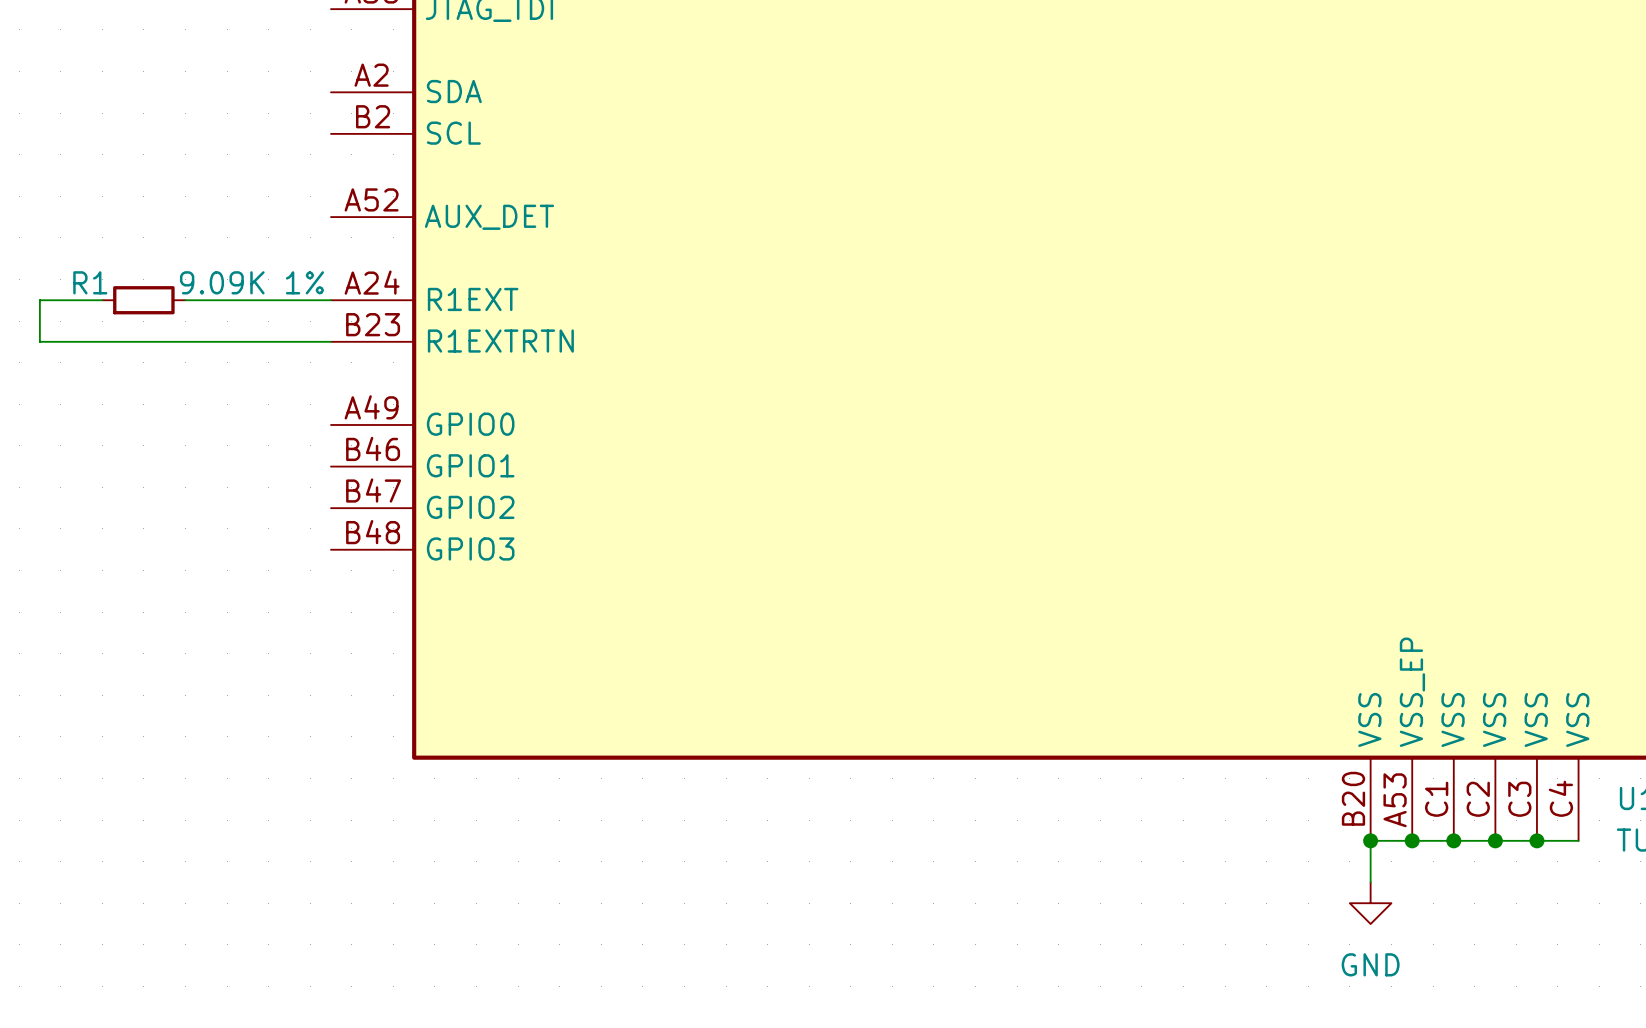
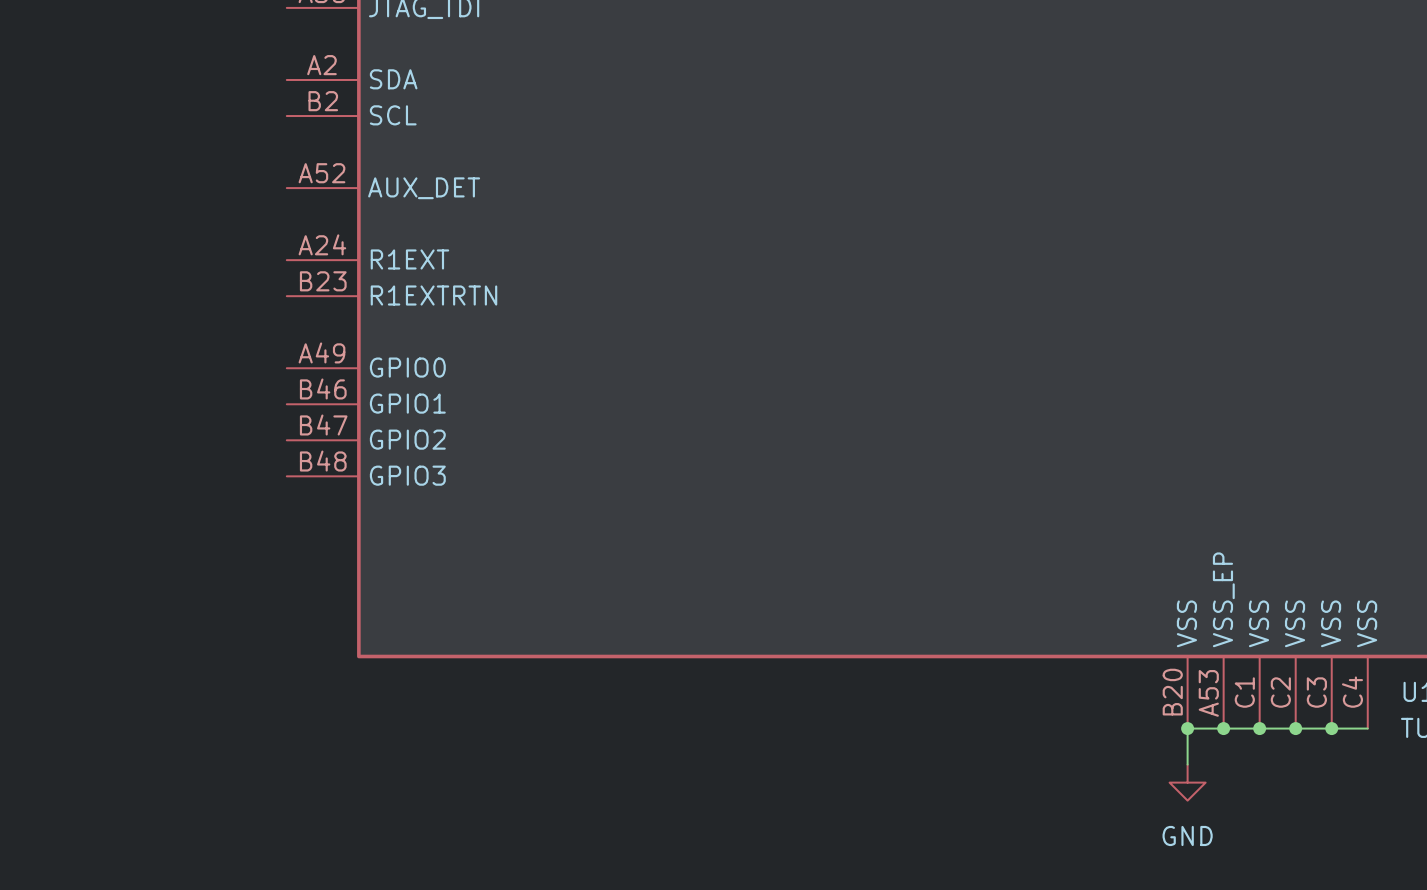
wire: (102, 300) (39, 300) (39, 341) (331, 341) -> none
R1: 9.09K 1% (143, 300) -> none
wire: (185, 300) (331, 300) -> none

